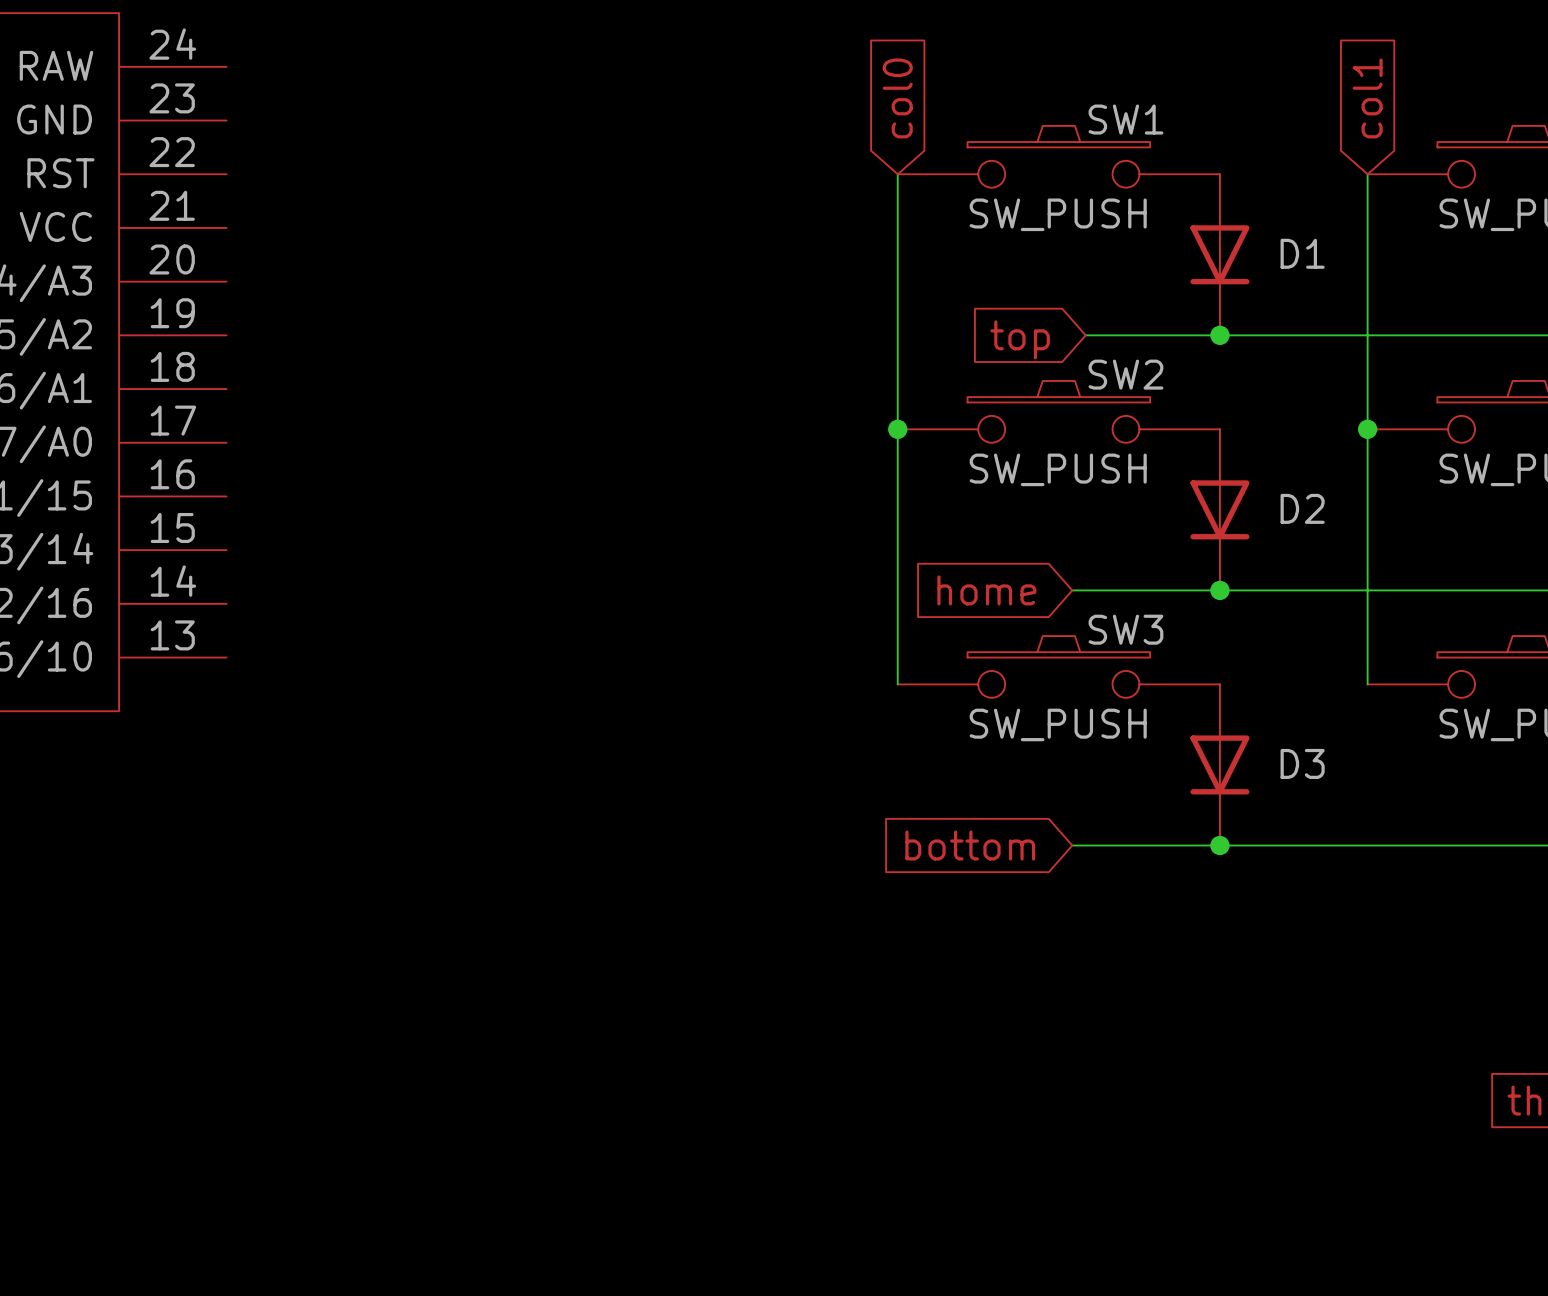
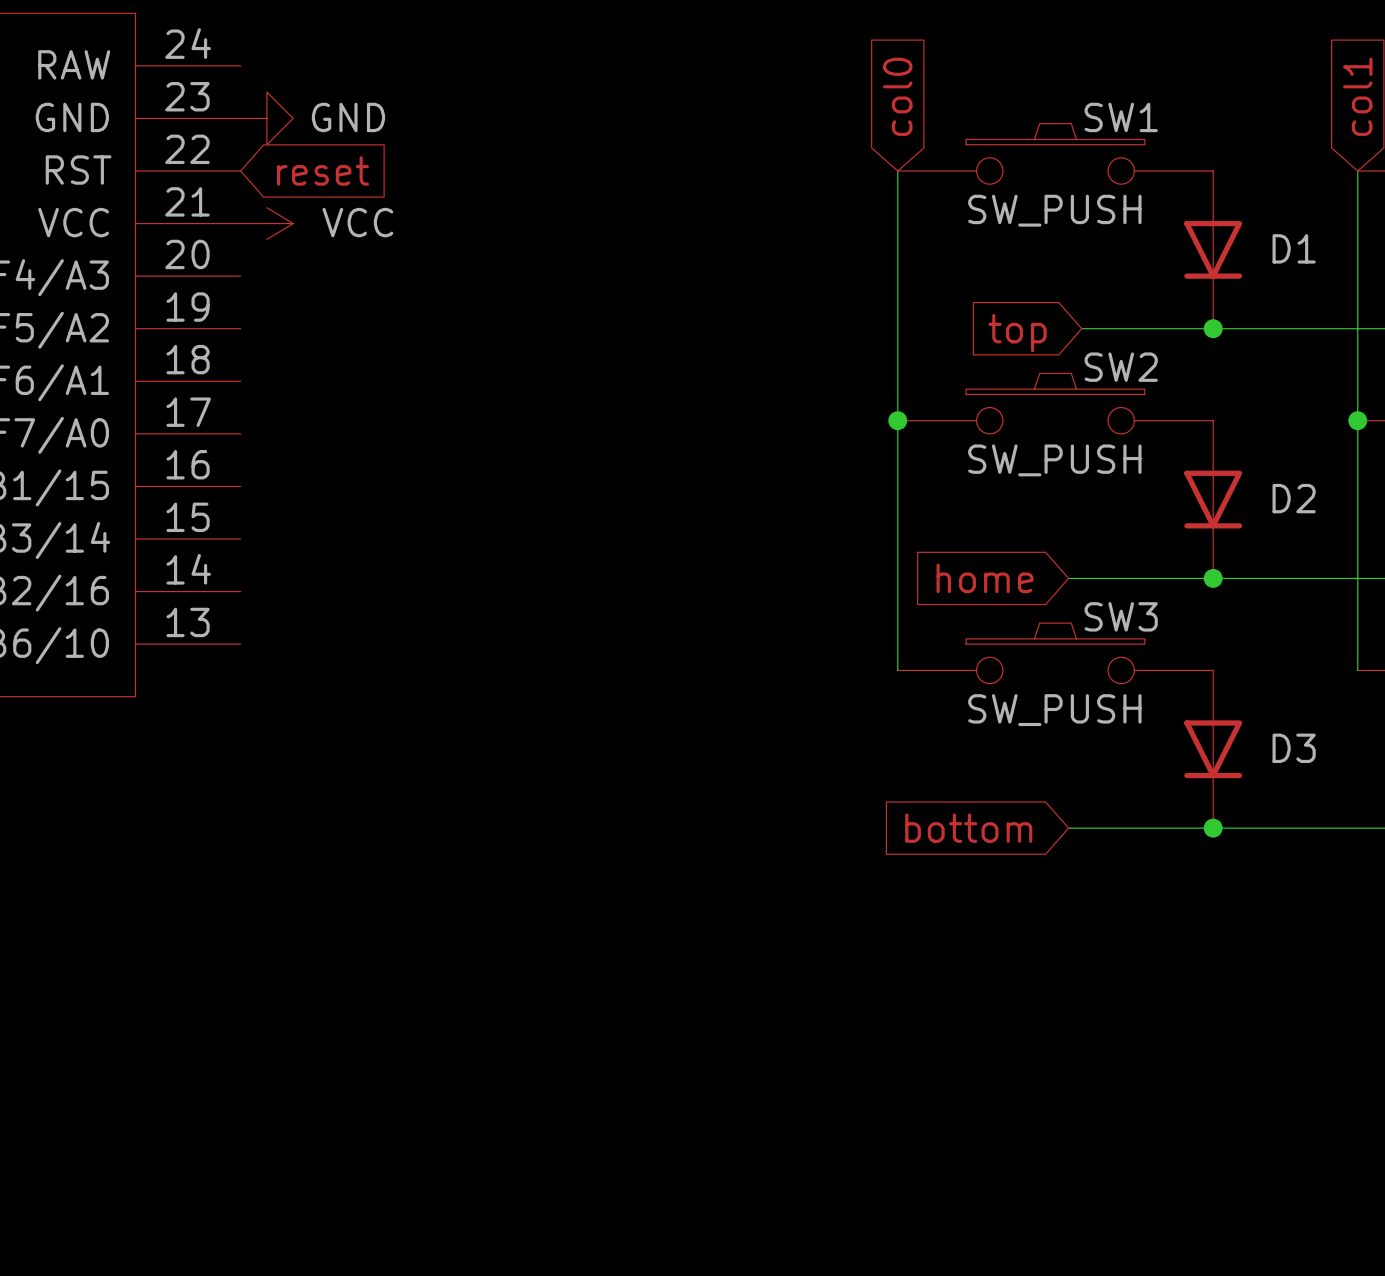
power symbol: none -> GND (266, 118)
global label: none -> reset (322, 171)
power symbol: none -> VCC (266, 223)

